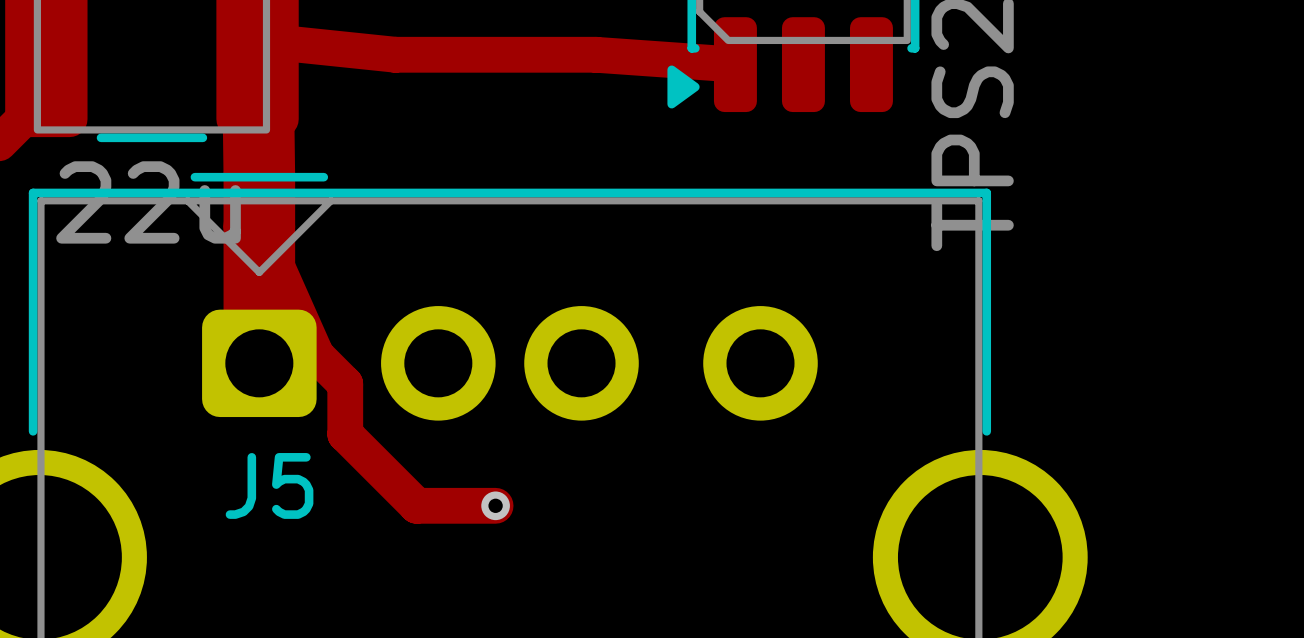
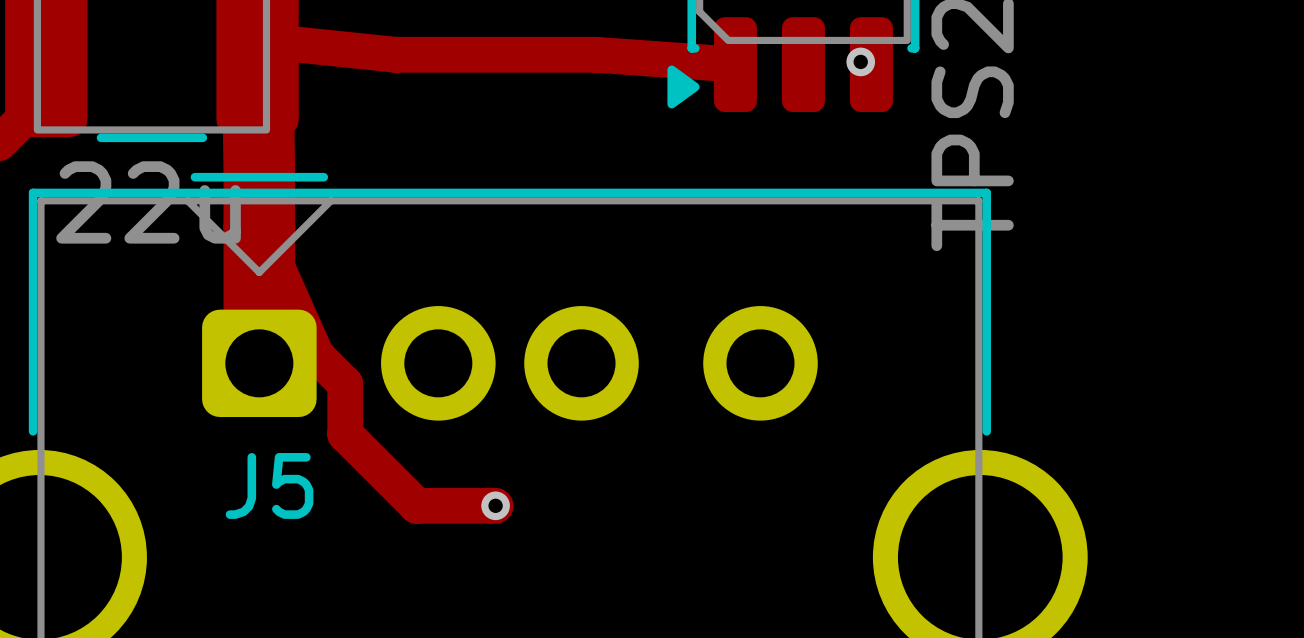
via: none -> (860, 61)

